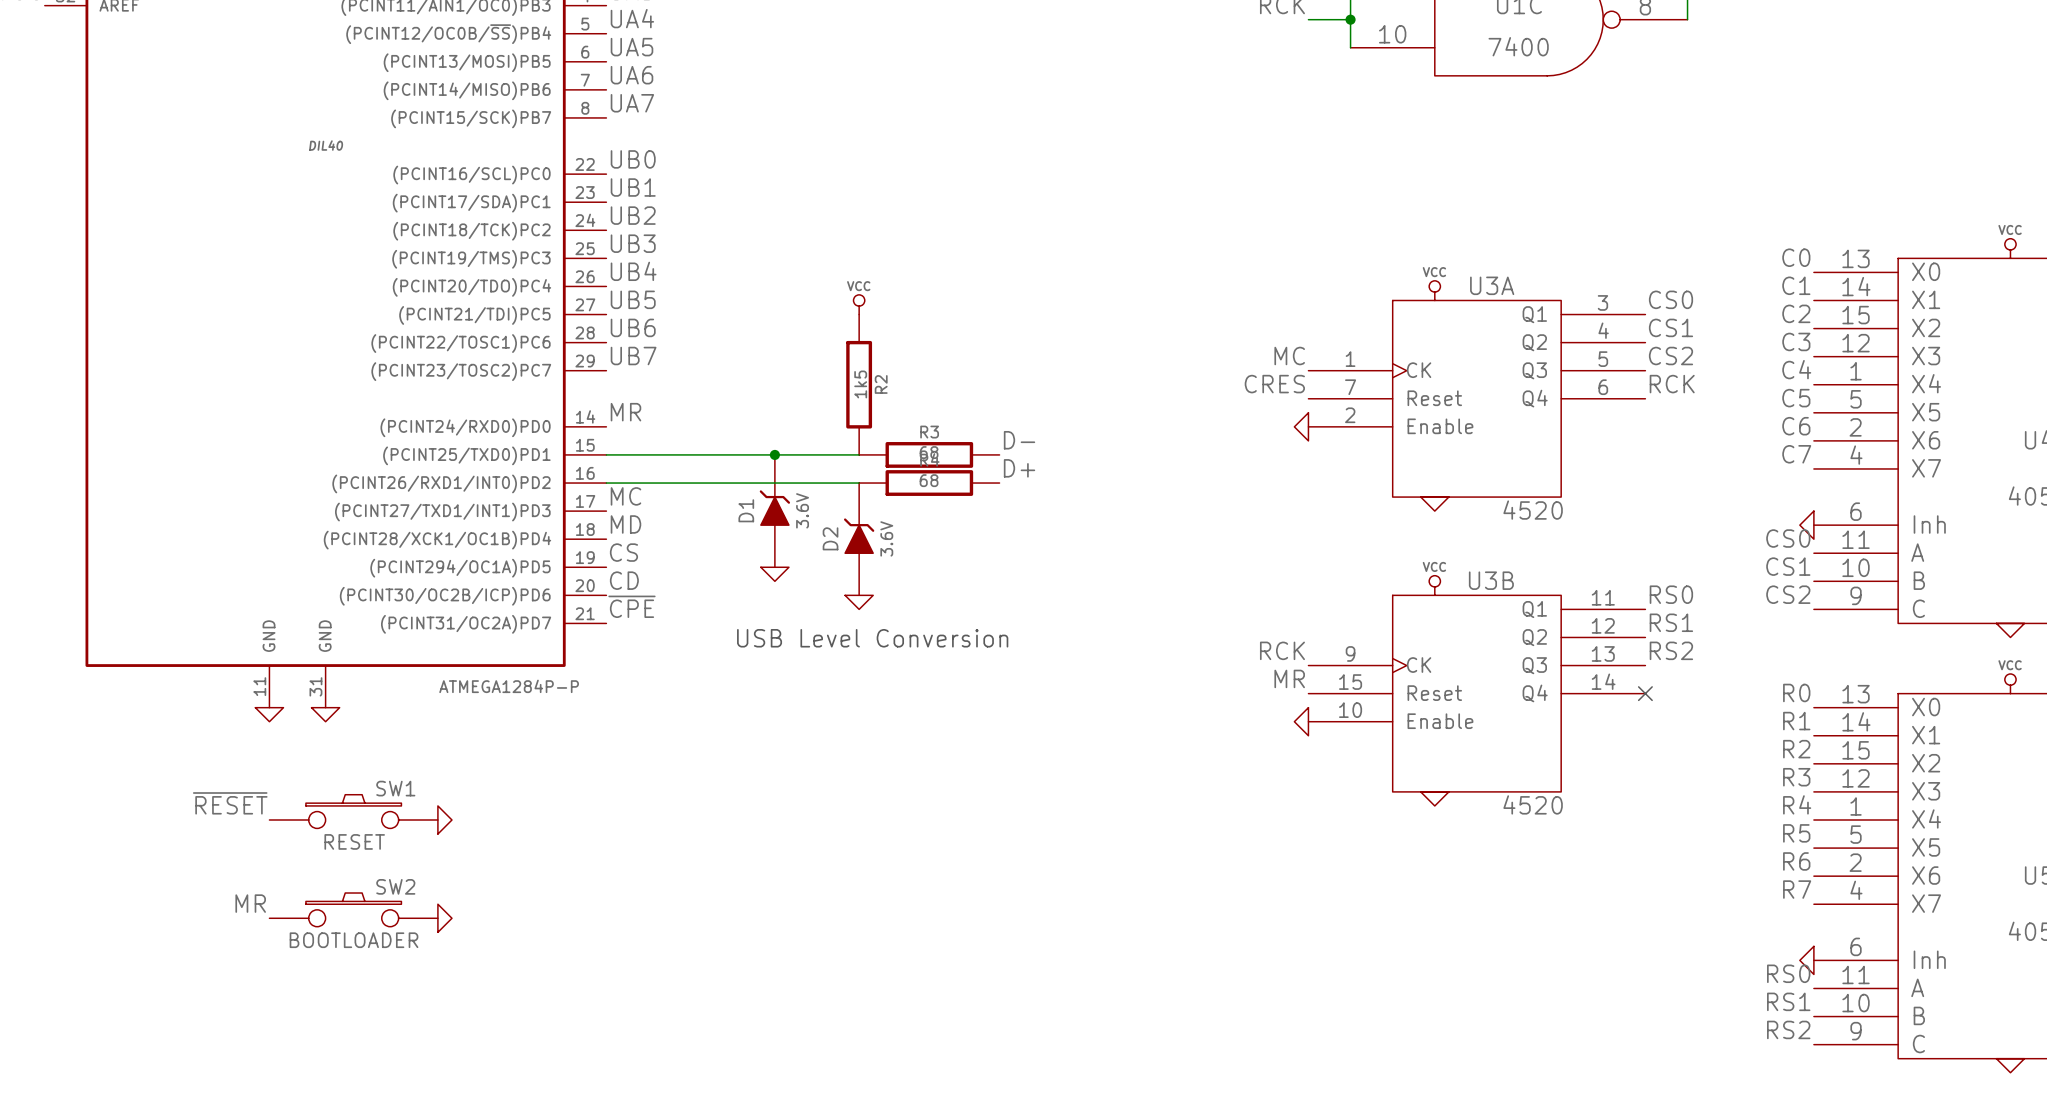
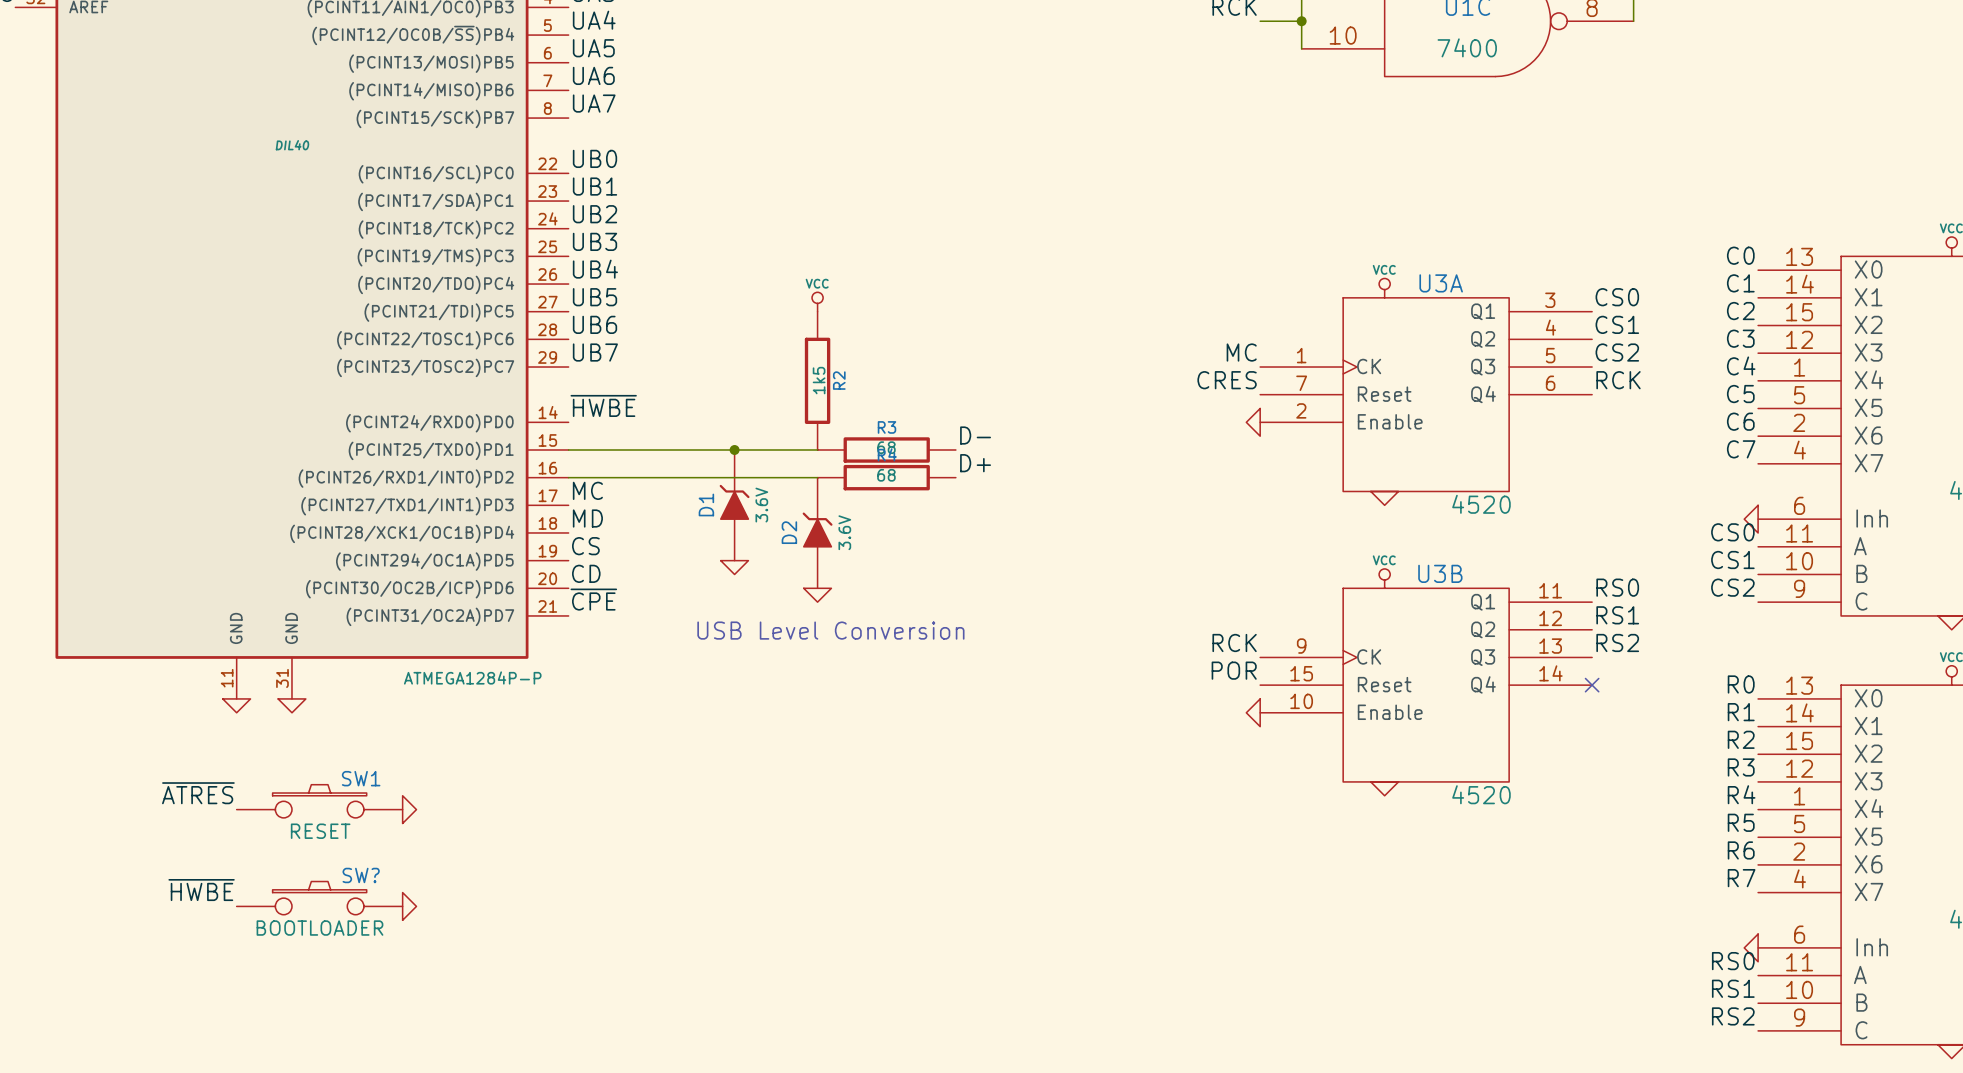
label: MR (625, 412) -> ~{HWBE} (603, 405)
label: MR (1289, 678) -> POR (1234, 670)
label: ~{RESET} (230, 803) -> ~{ATRES} (198, 793)
SW2 name: SW2 (395, 886) -> SW? (361, 875)
label: MR (250, 903) -> ~{HWBE} (201, 890)

